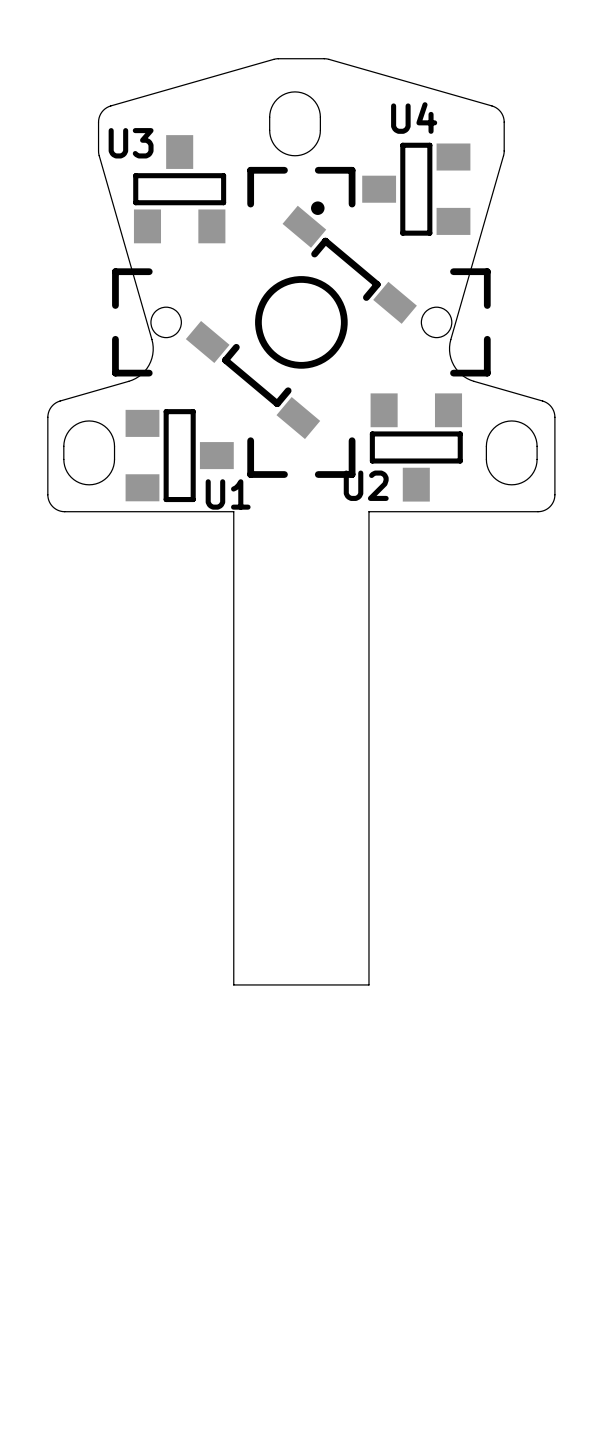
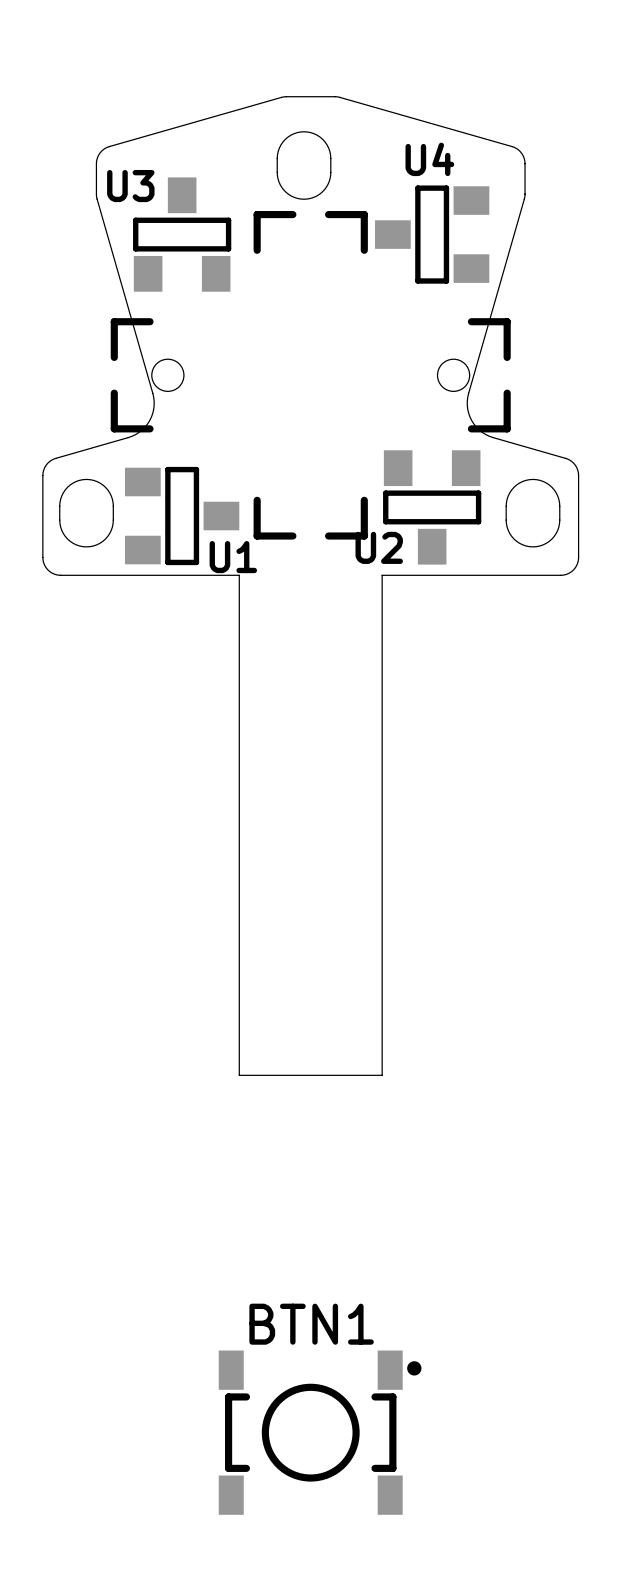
part: (301, 320) -> none
BTN1: none -> (320, 1432)

